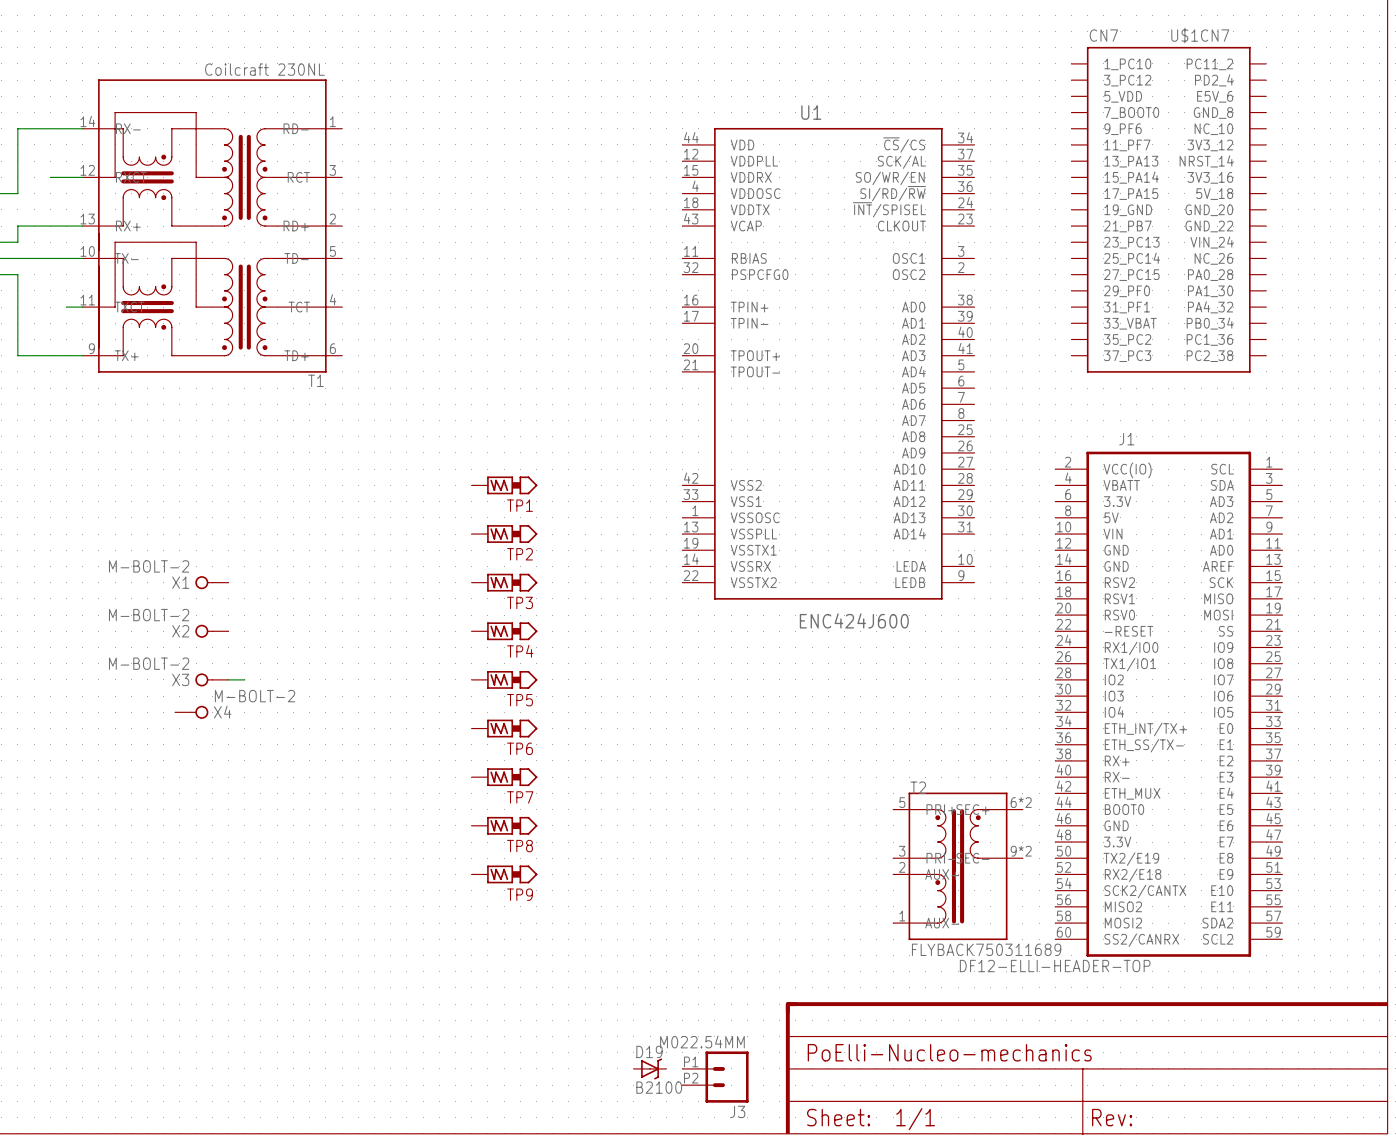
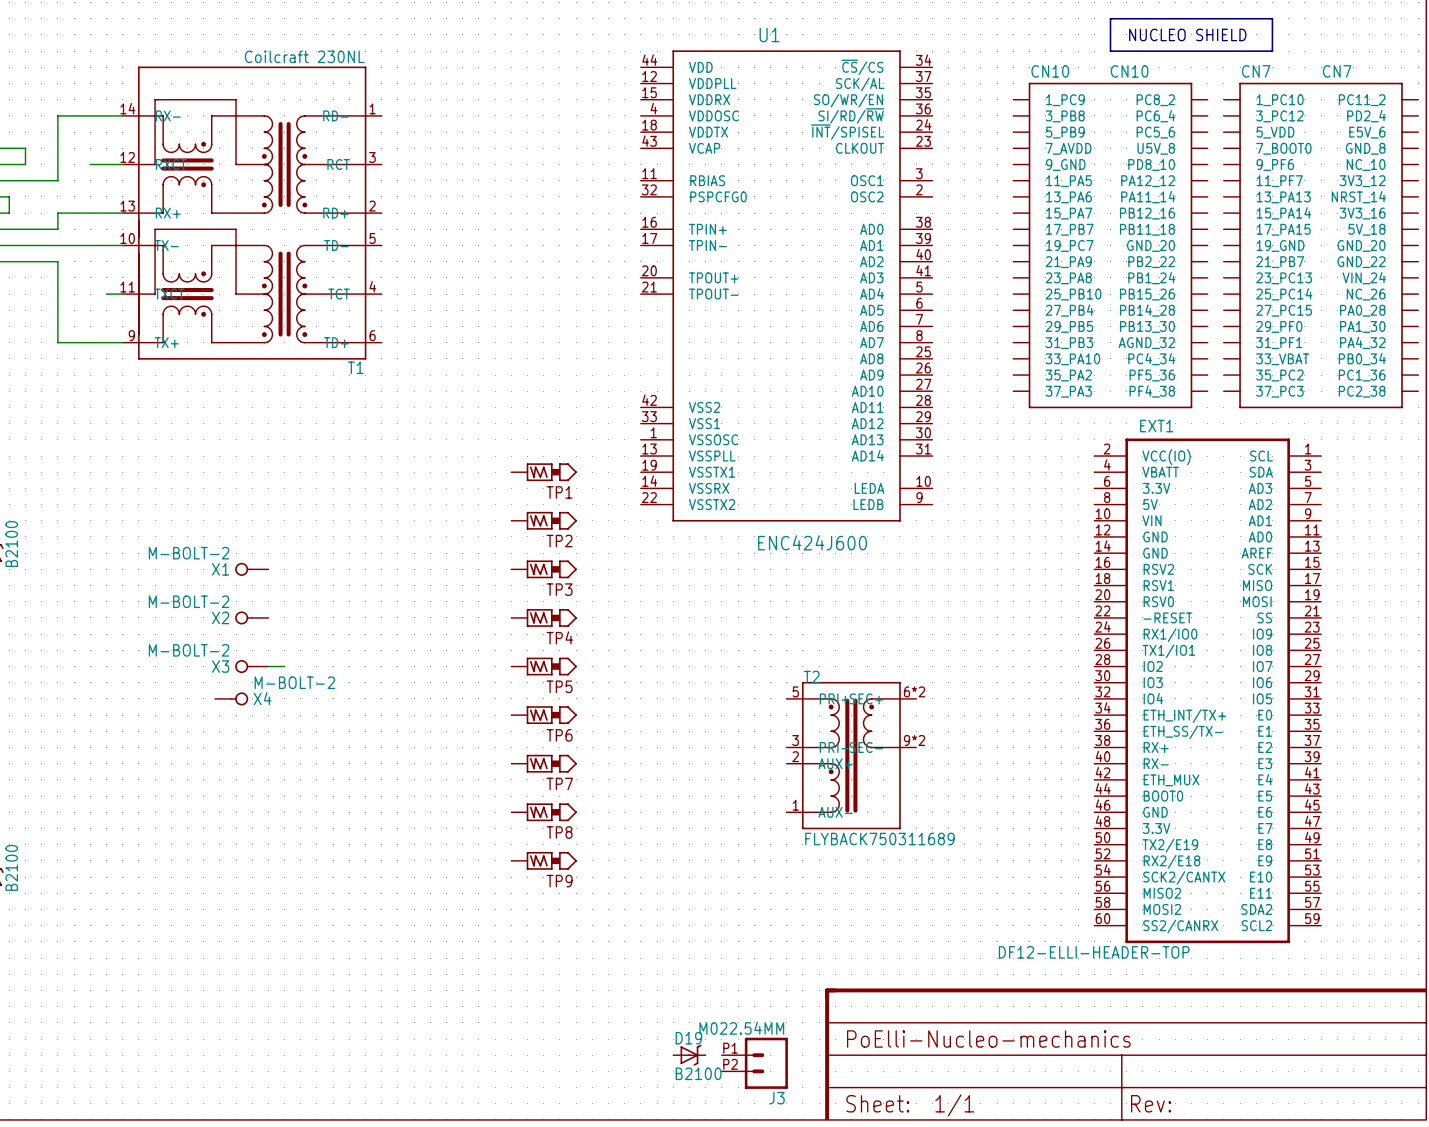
part: none -> (1191, 34)
U$1CN7: (1168, 209) -> none
CN10: none -> (1110, 245)
CN7: none -> (1321, 245)
U1 position: (828, 363) -> (786, 285)
J1 name: J1 (1126, 439) -> EXT1 (1156, 426)
T2 position: (958, 866) -> (851, 755)

